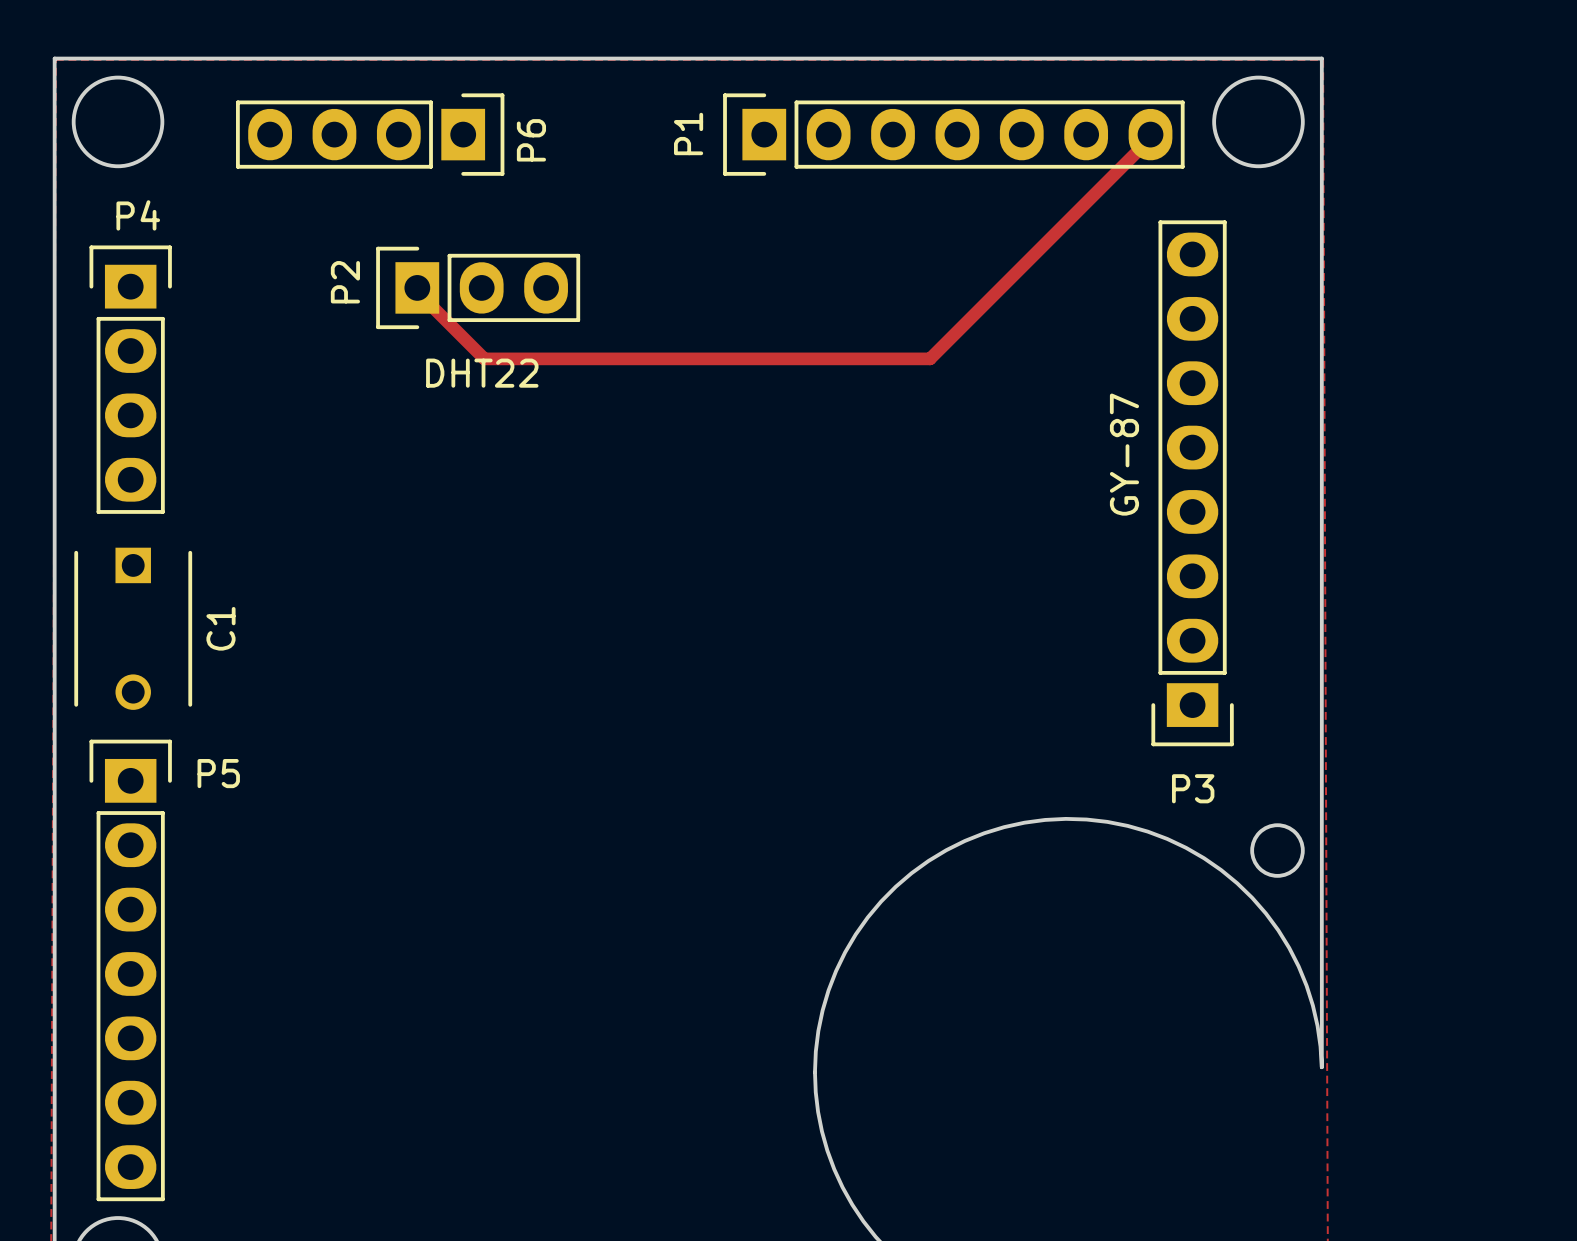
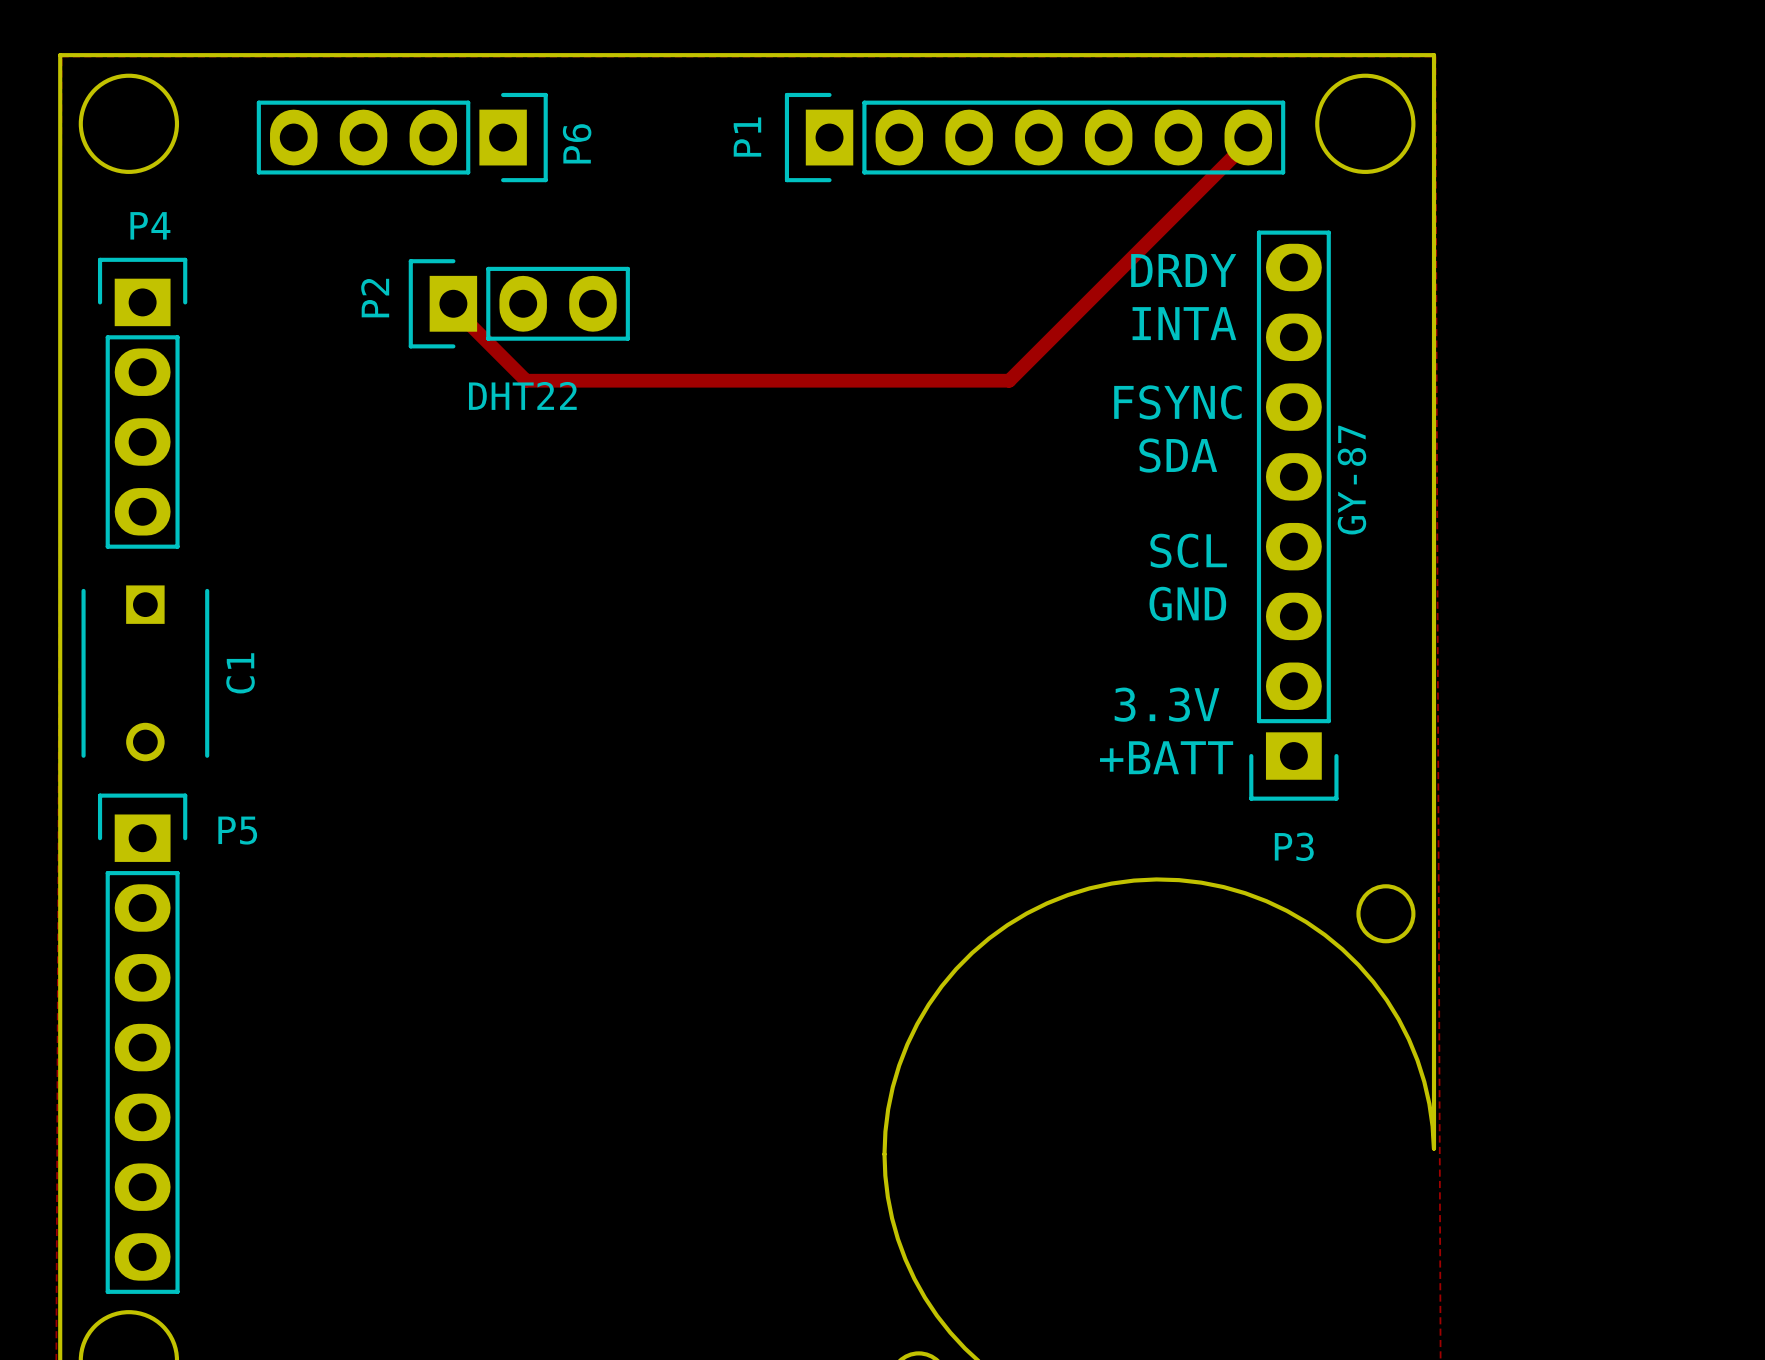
text: none -> DRDY (1183, 270)
text: none -> INTA (1184, 323)
text: none -> FSYNC (1177, 402)
text: none -> SDA (1178, 455)
P3 value position: GY-87 (1124, 454) -> GY-87 (1351, 480)
text: none -> SCL (1188, 550)
text: none -> GND (1187, 603)
text: none -> 3.3V (1167, 704)
text: none -> +BATT (1166, 757)

